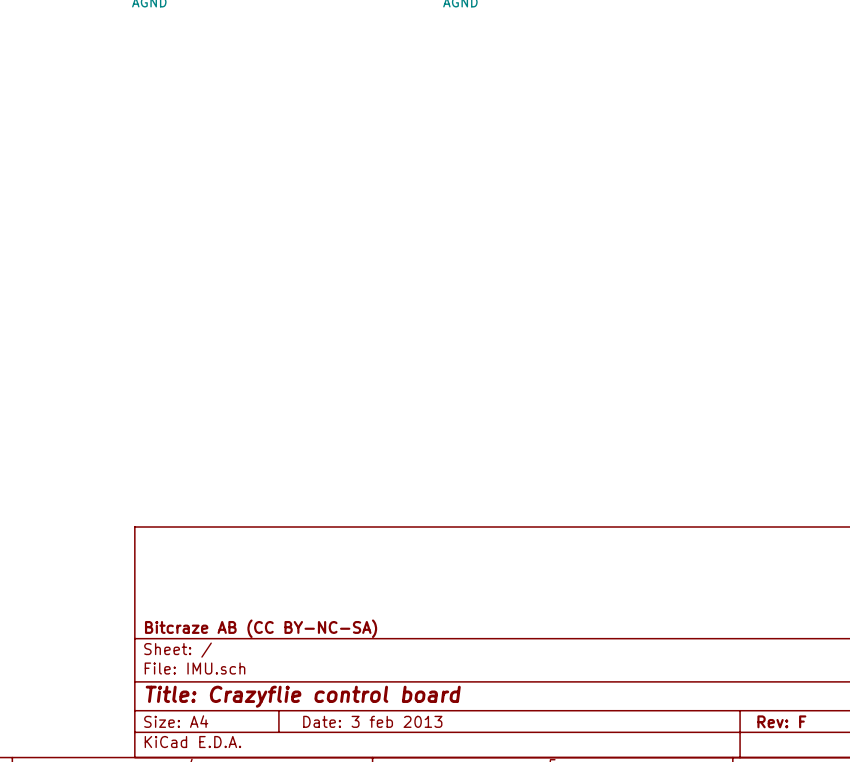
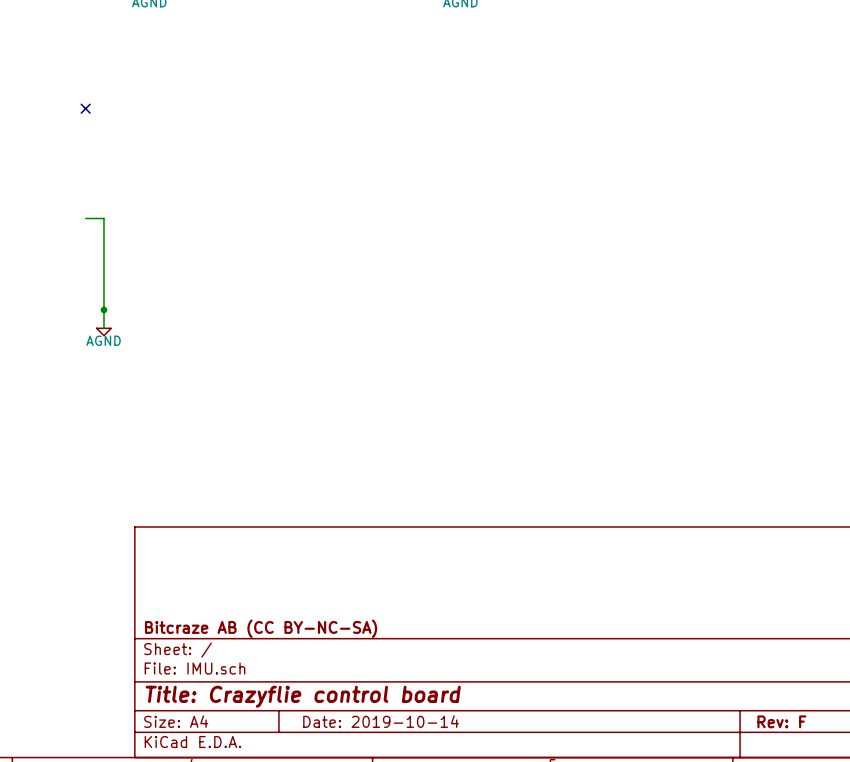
no-connect mark: none -> (85, 108)
wire: none -> (85, 218) (103, 218) (103, 328)
junction: none -> (103, 310)
power symbol: none -> AGND (103, 331)
title block: Date: 3 feb 2013 (372, 721) -> Date: 2019-10-14 (381, 721)

